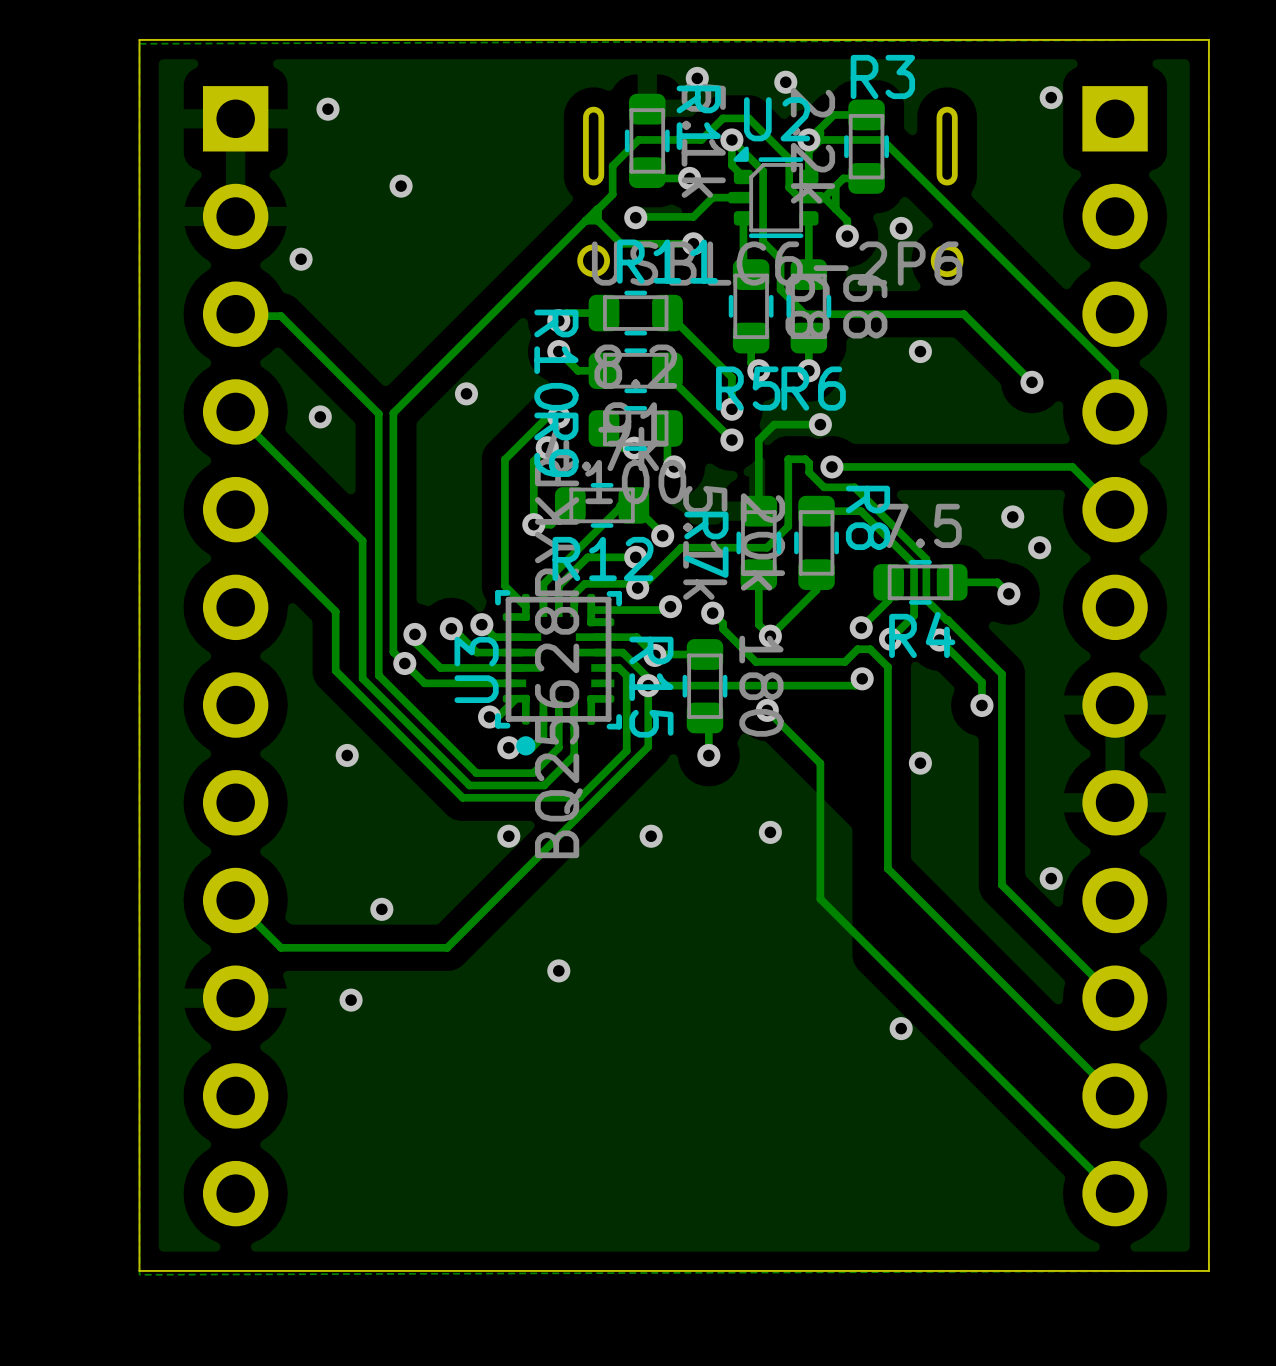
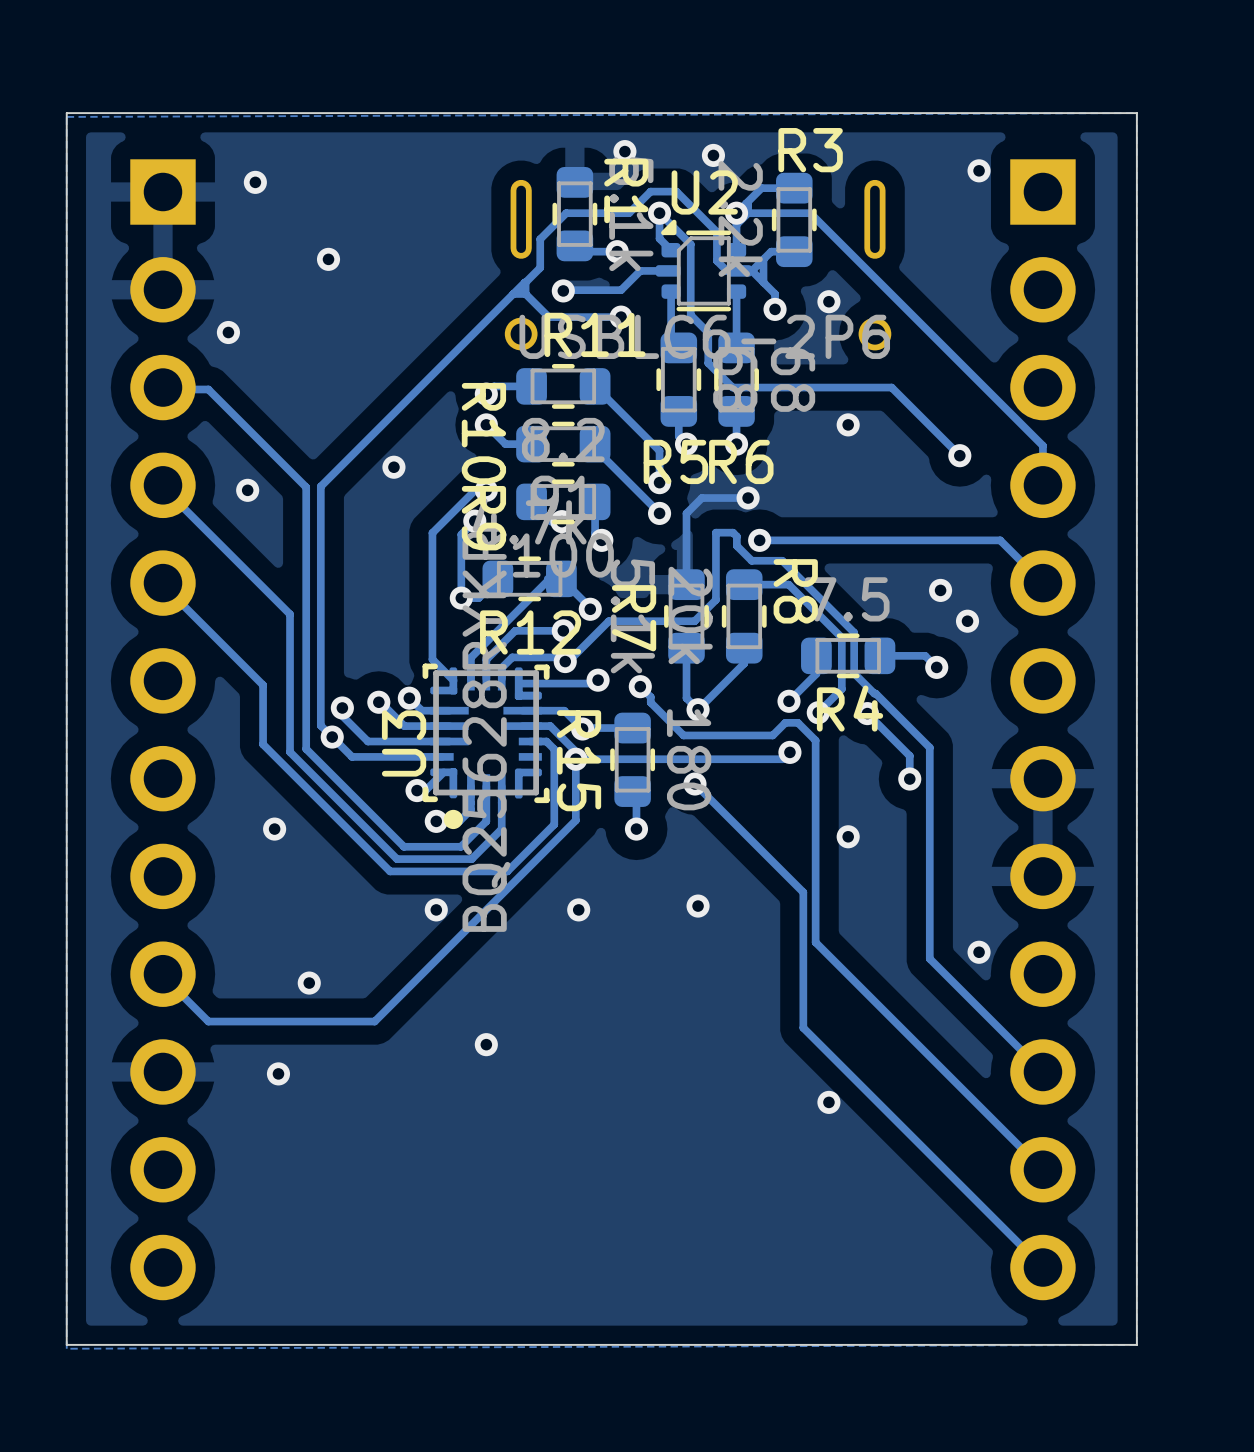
track: (820, 763) (820, 898) (875, 954) -> (748, 837) (803, 892) (803, 1027)

